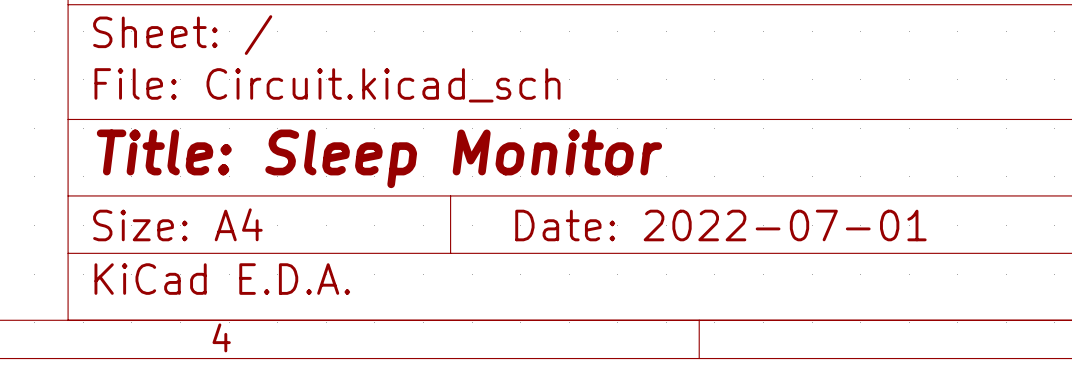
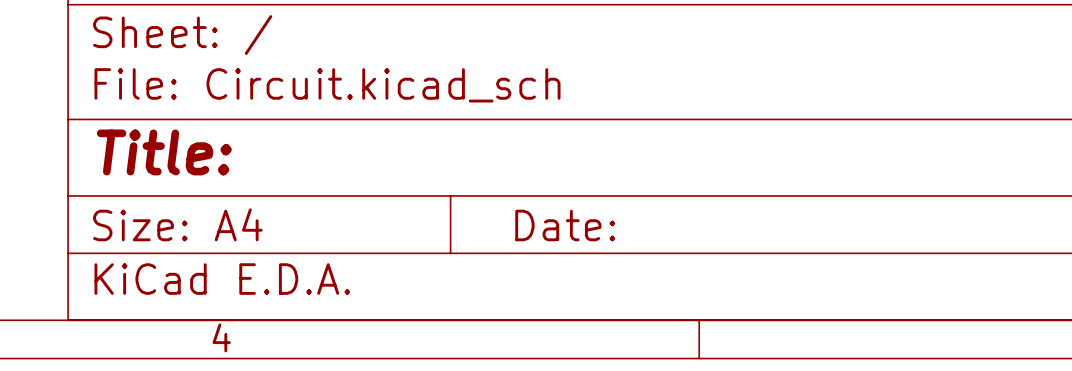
title block: Title: Sleep Monitor (379, 158) -> Title: (164, 152)
title block: Date: 2022-07-01 (720, 225) -> Date: (565, 225)

